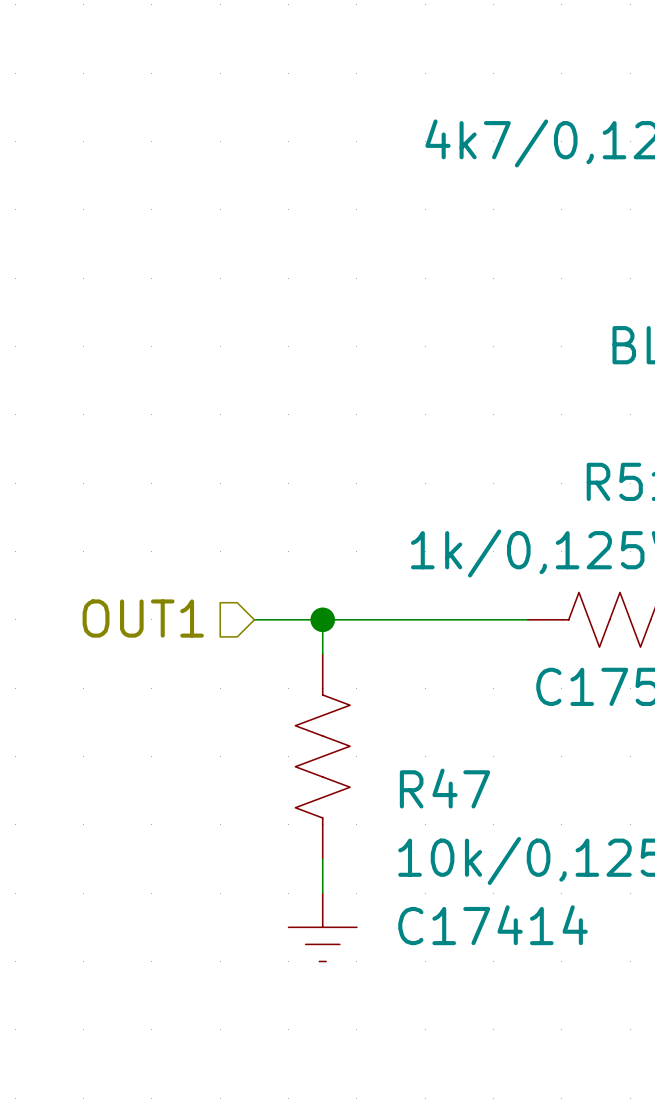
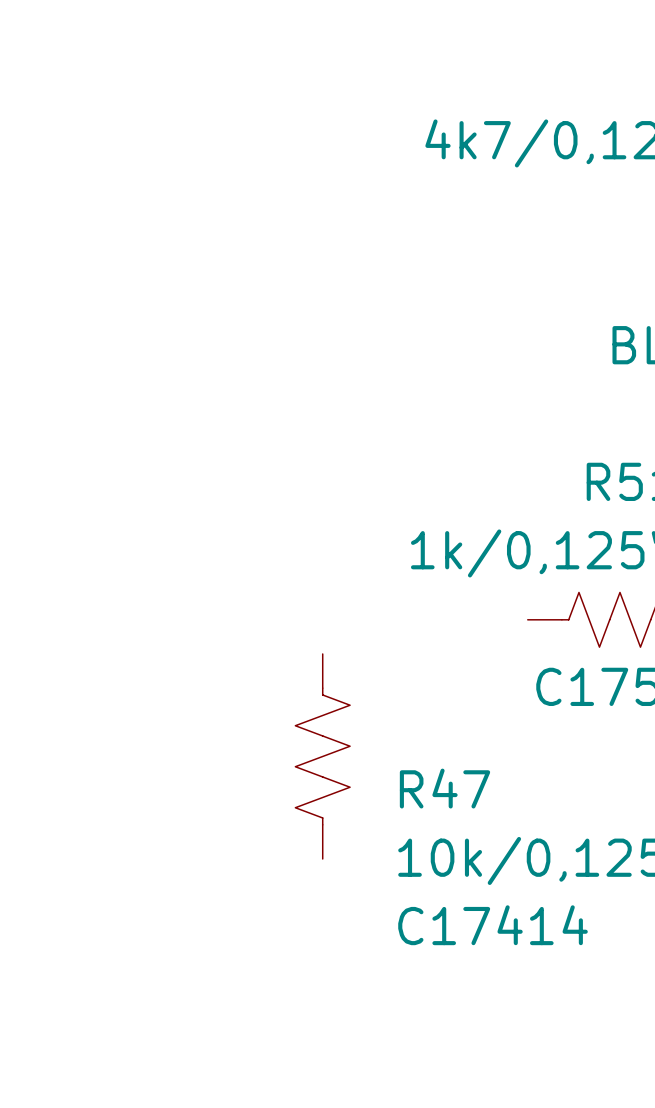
hierarchical label: OUT1 (143, 618) -> none
wire: (254, 619) (527, 619) -> none
wire: (322, 619) (322, 653) -> none
junction: (322, 619) -> none
wire: (322, 858) (322, 893) -> none
power symbol: (322, 927) -> none

